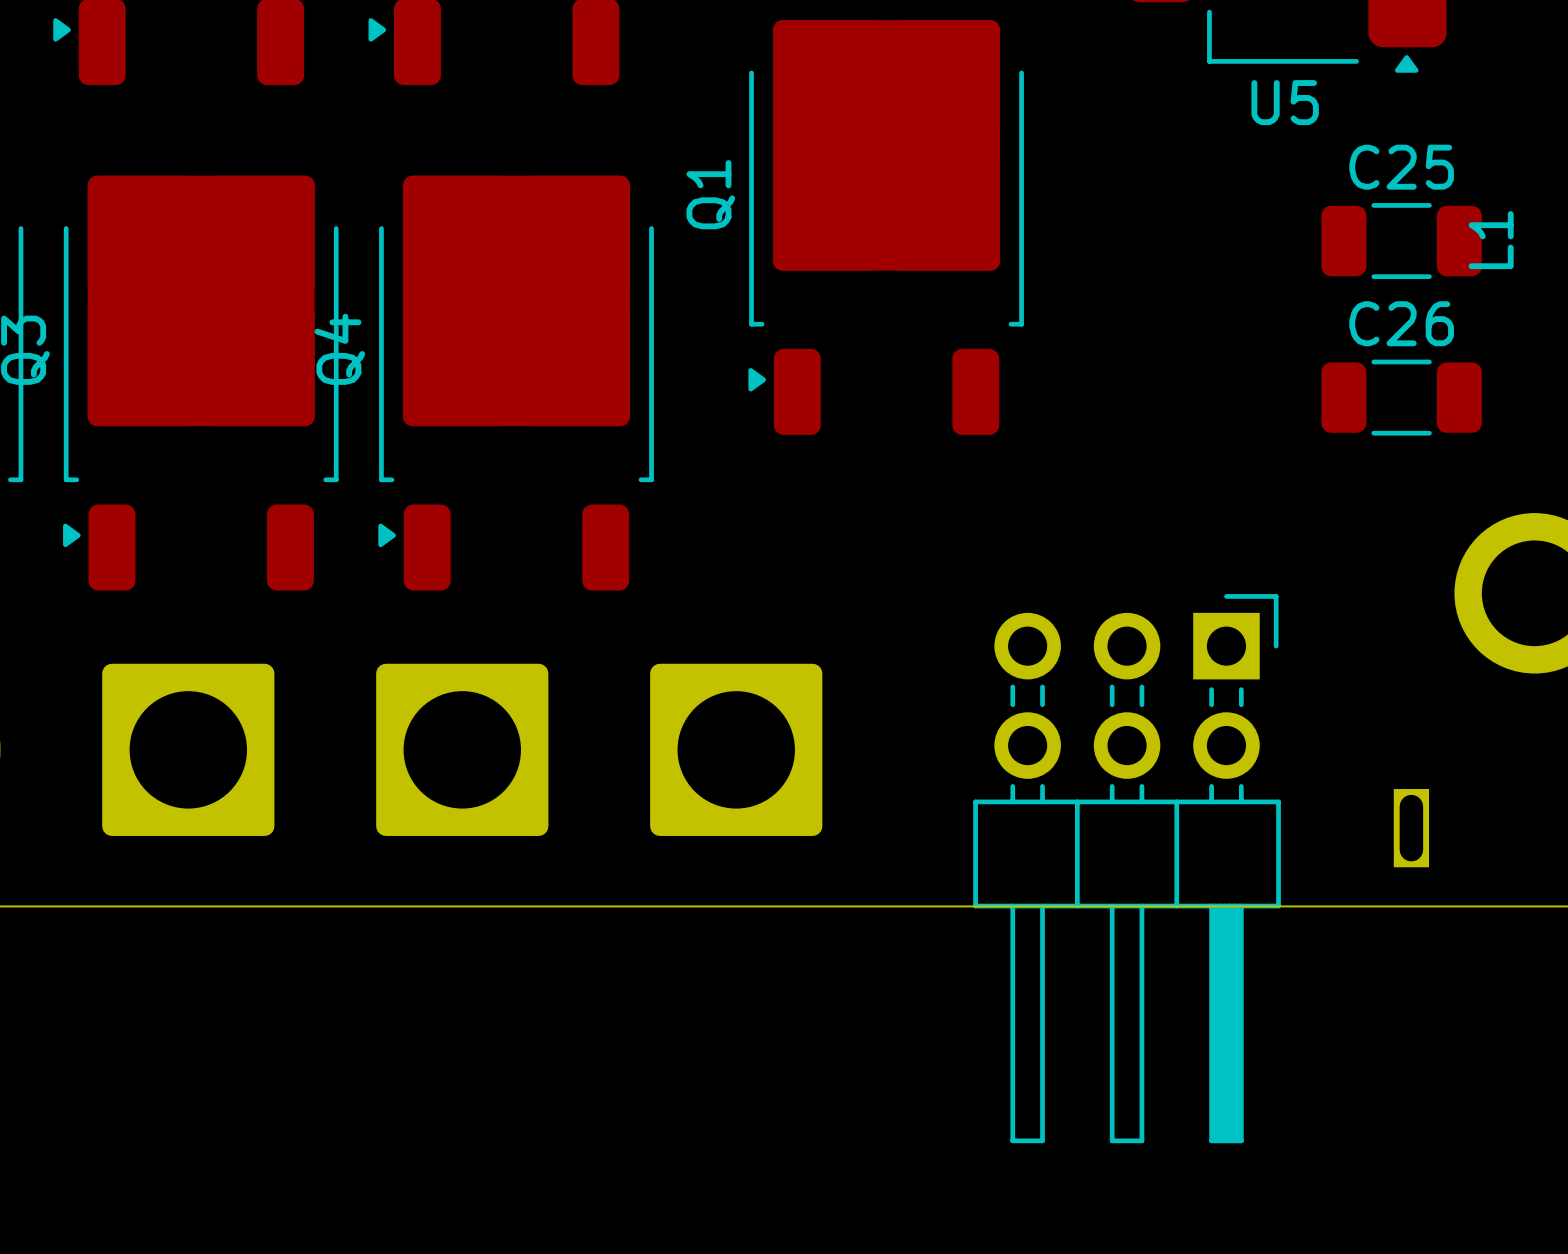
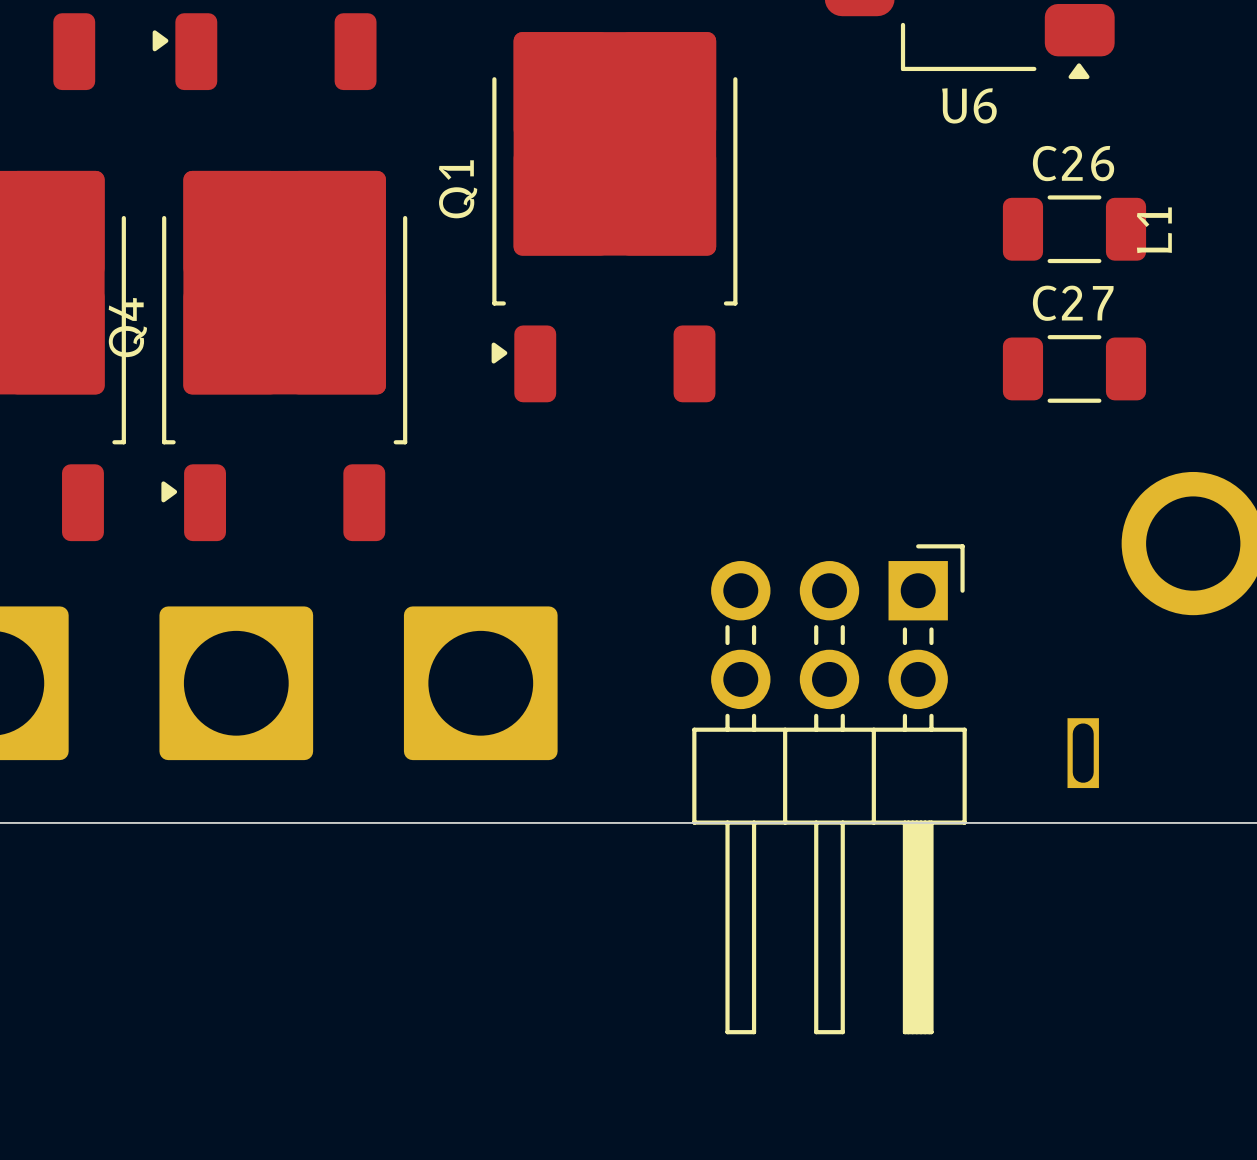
U5 name: U5 (1285, 102) -> U6 (969, 105)
C25 name: C25 (1401, 167) -> C26 (1073, 163)
C26 name: C26 (1401, 323) -> C27 (1073, 303)

